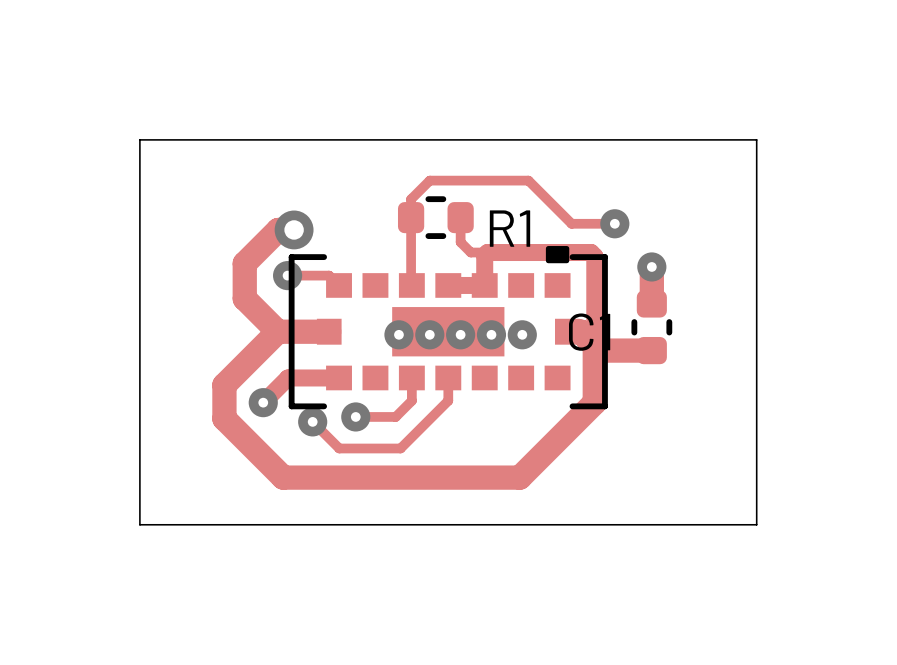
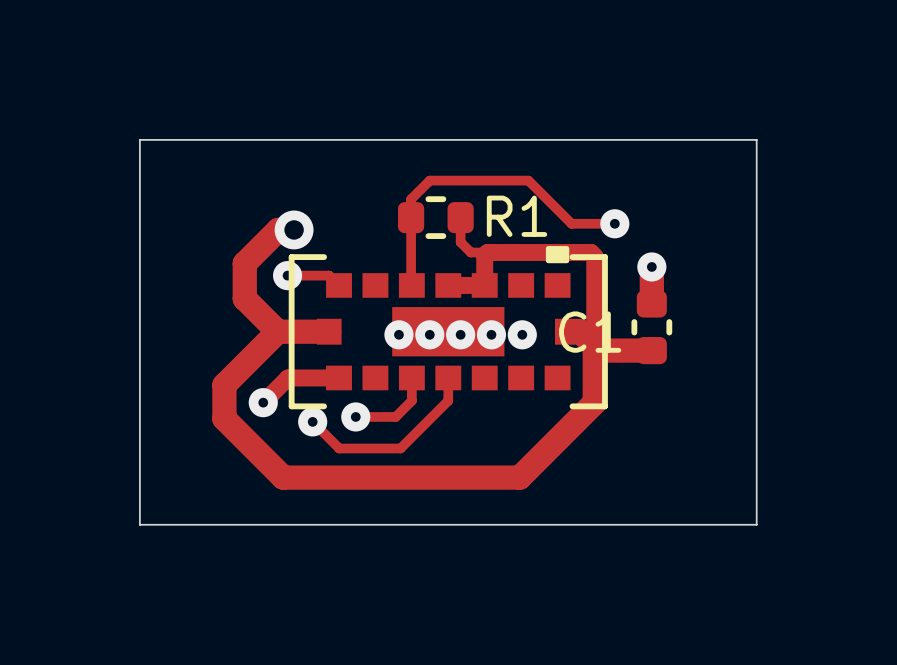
R1 name position: R1 (510, 228) -> R1 (517, 216)

